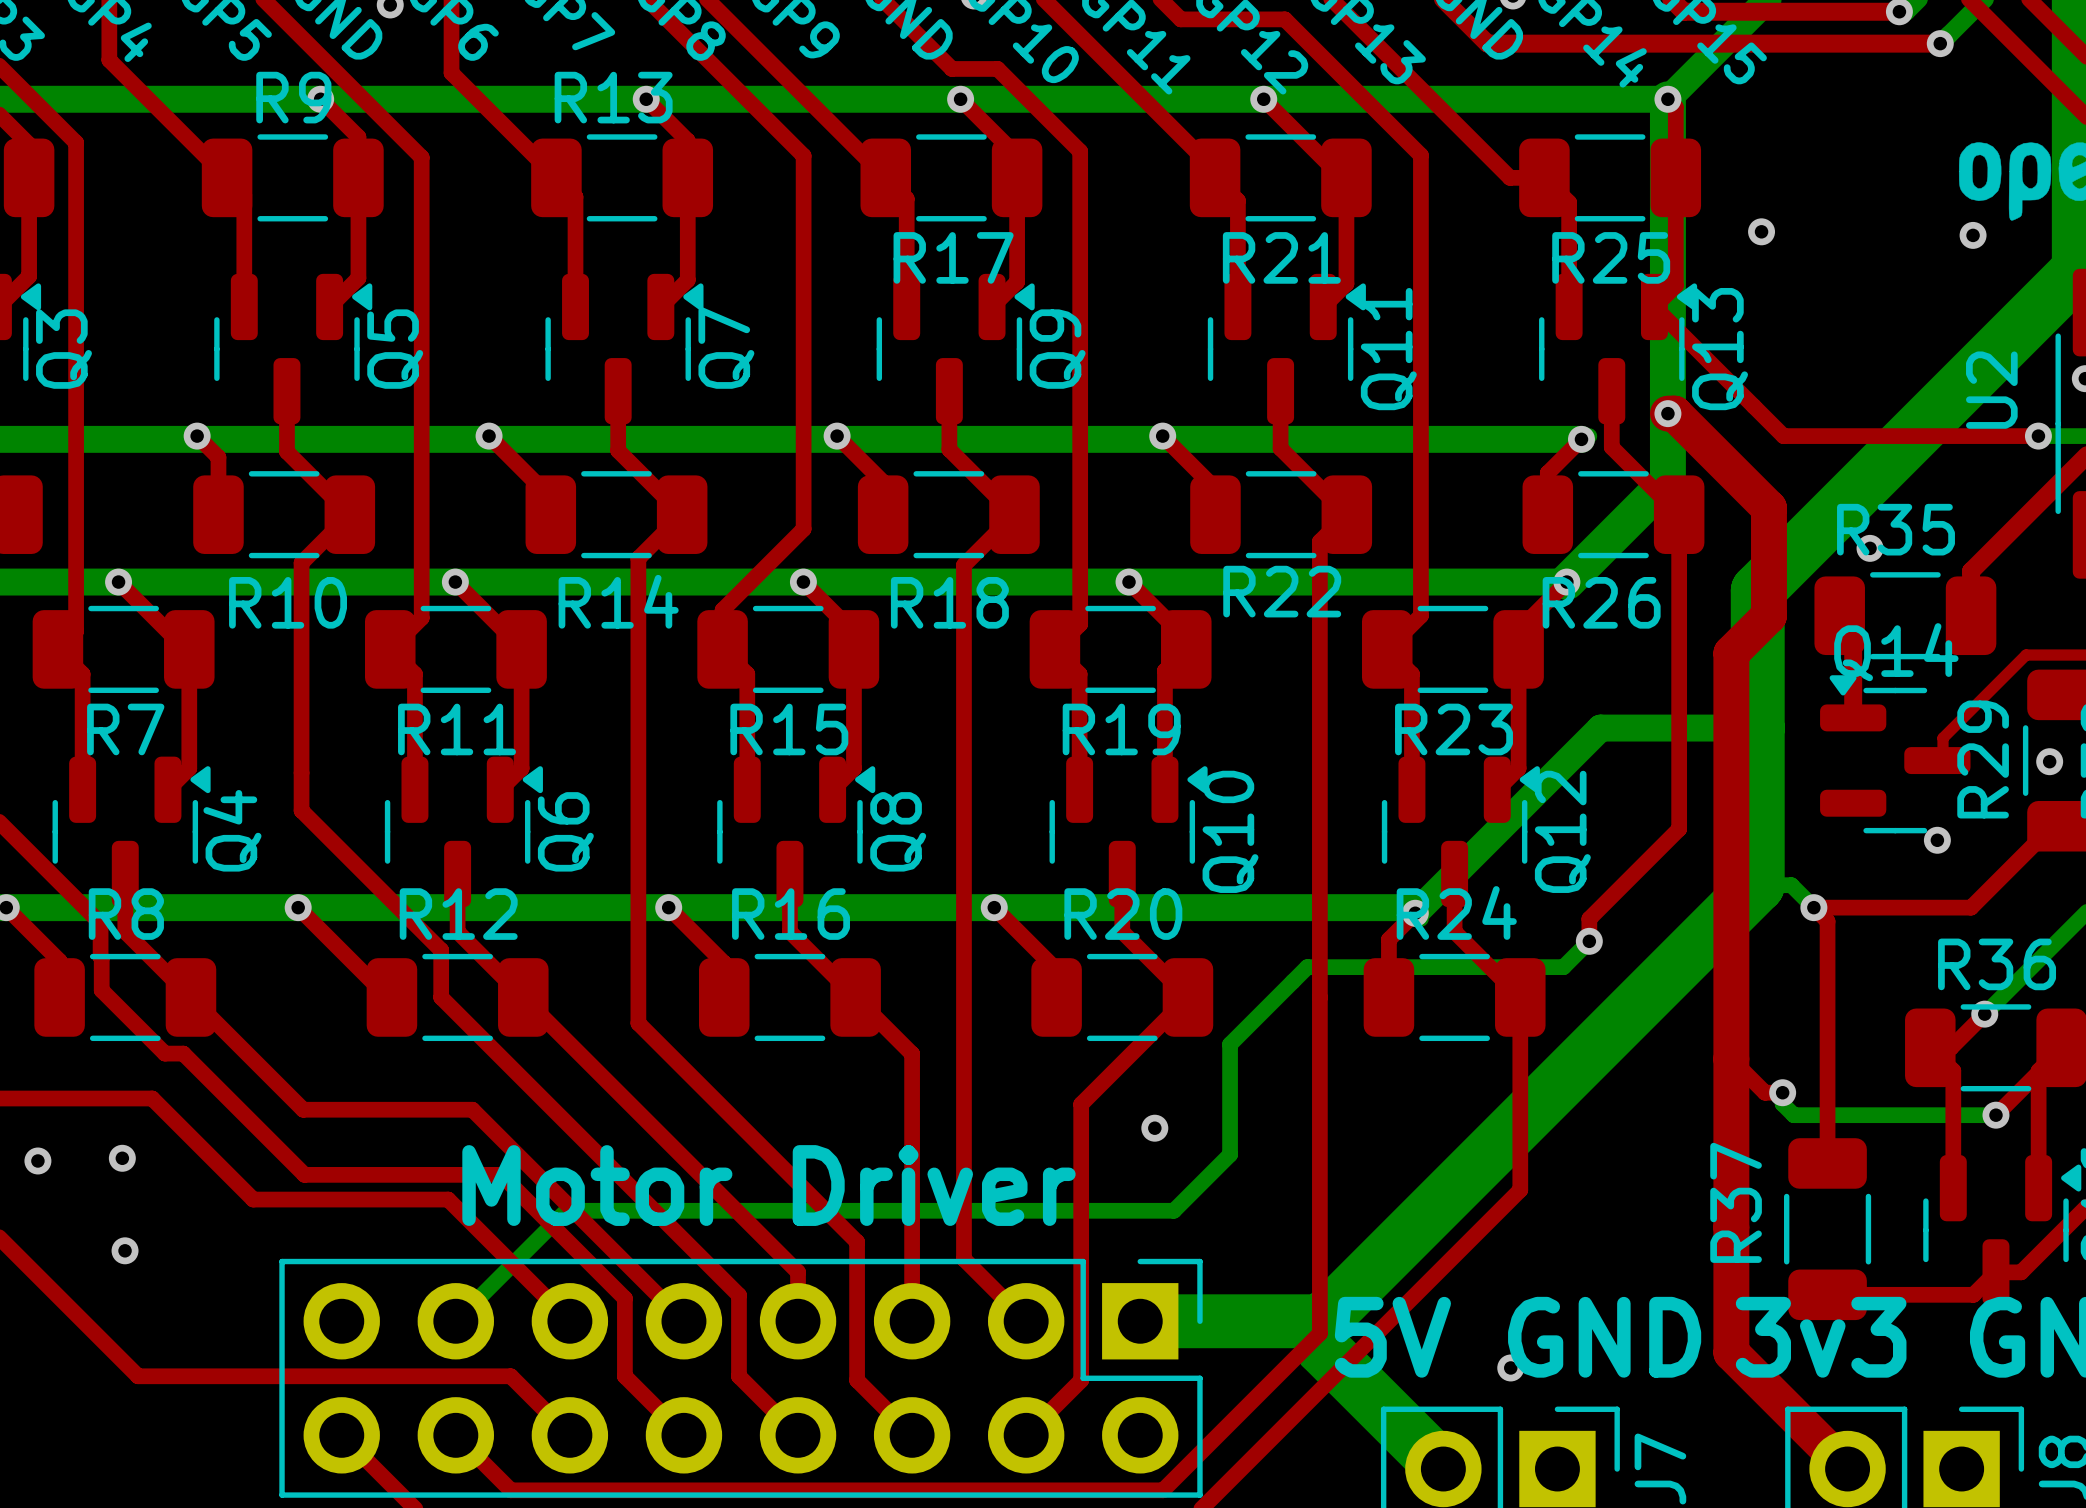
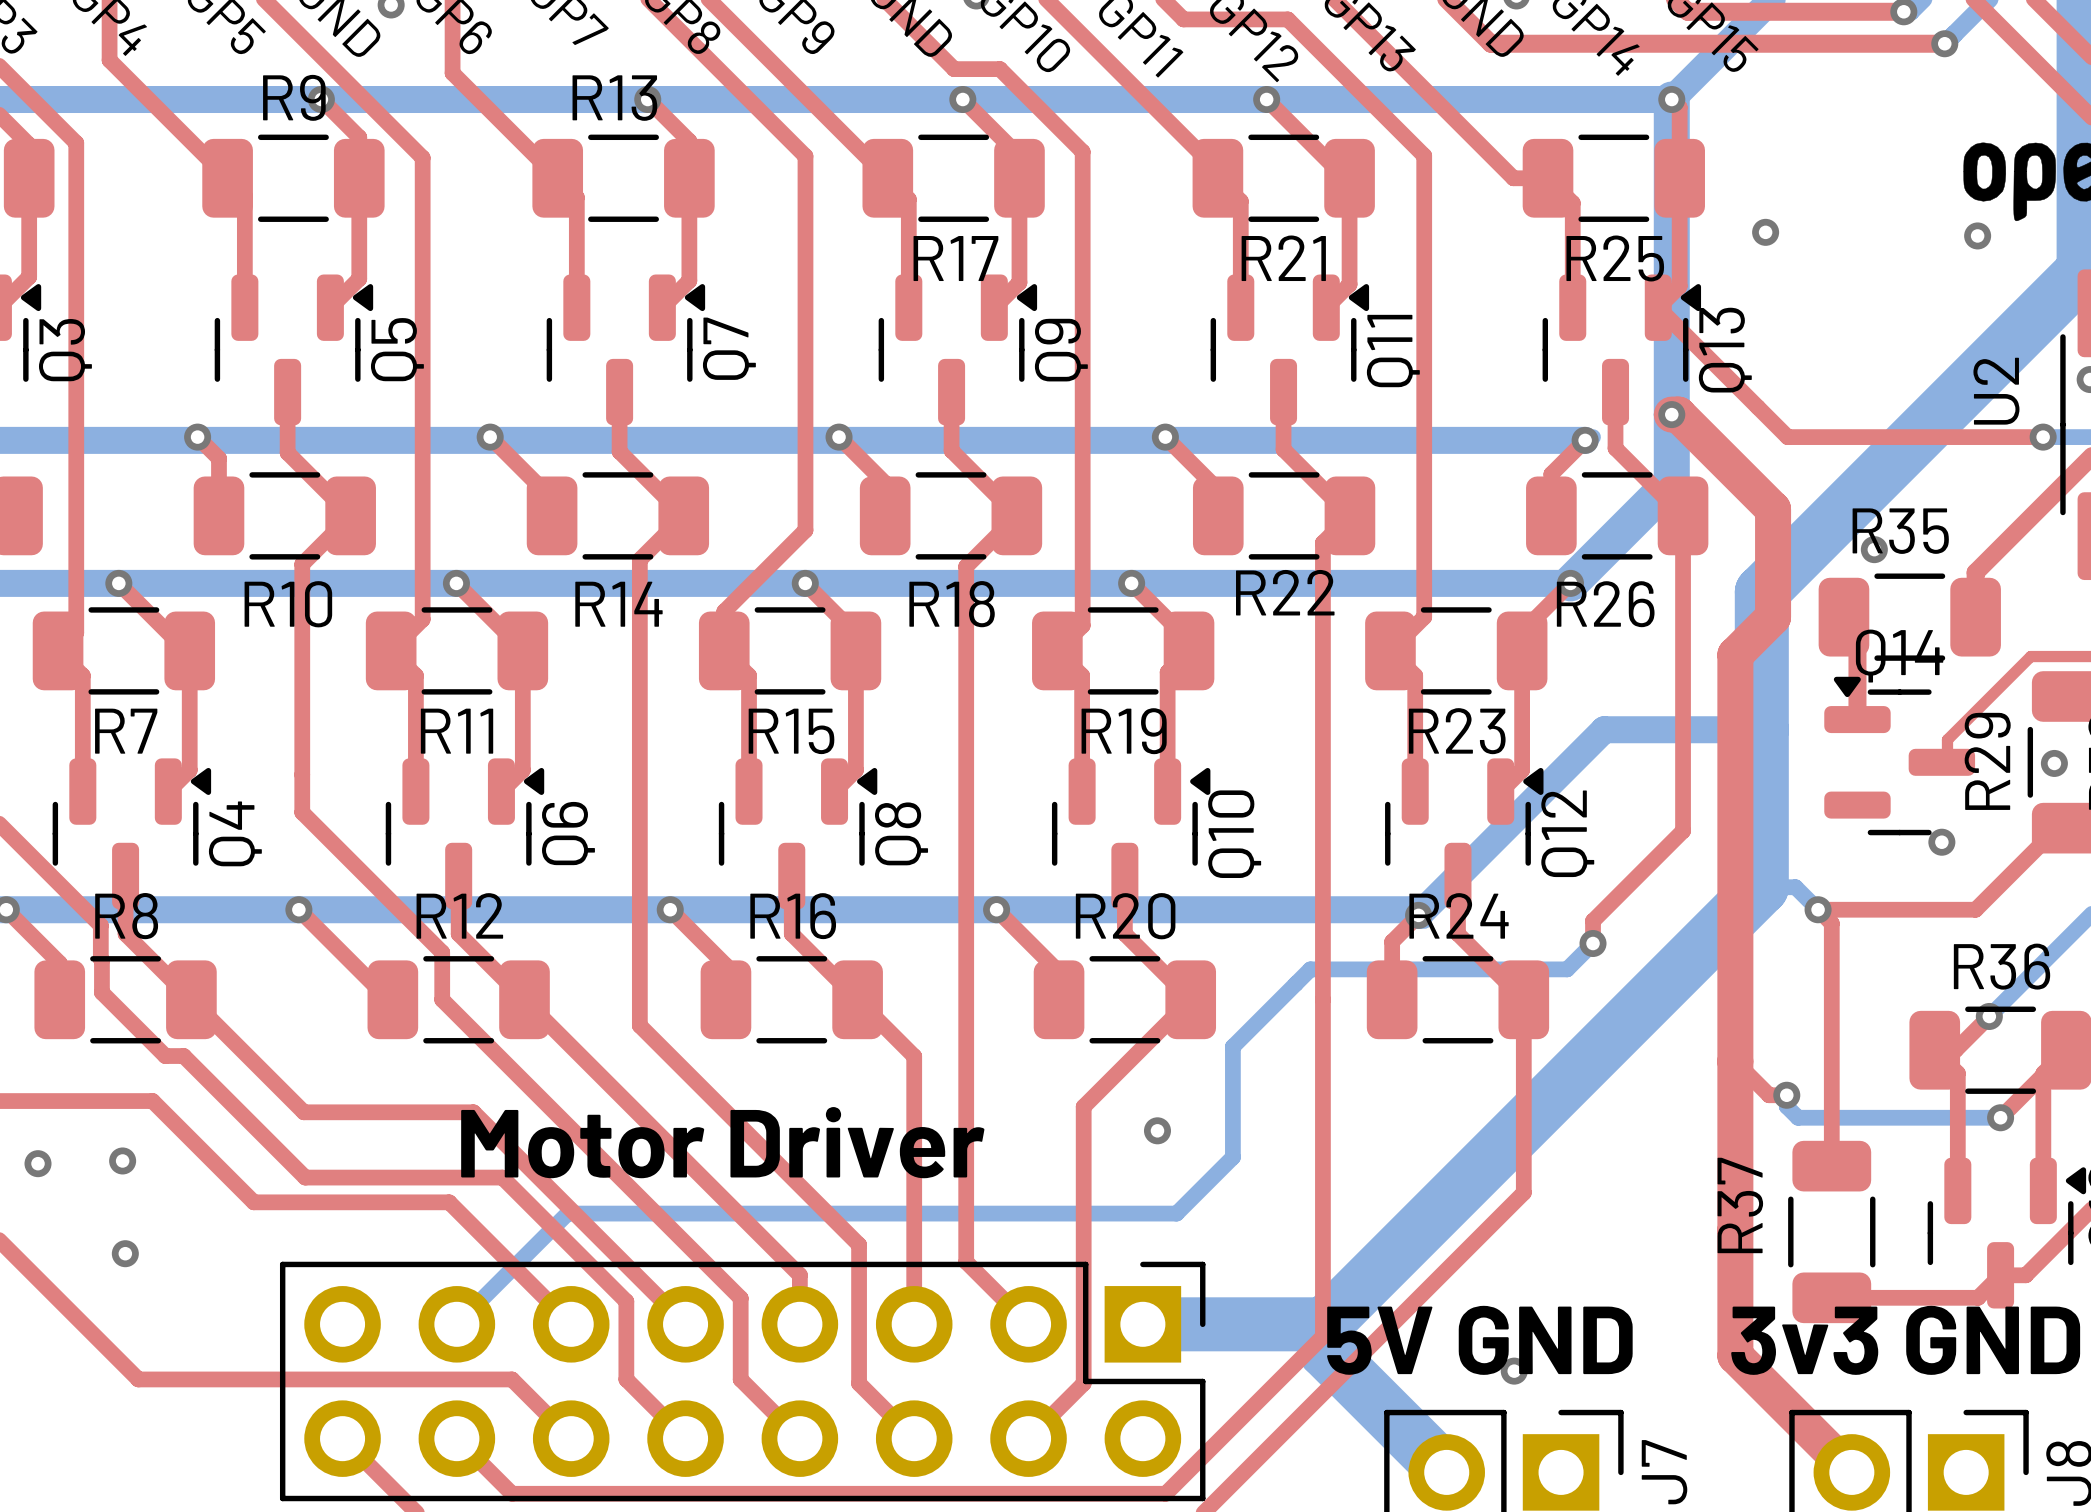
text position: Motor Driver (768, 1185) -> Motor Driver (722, 1142)

